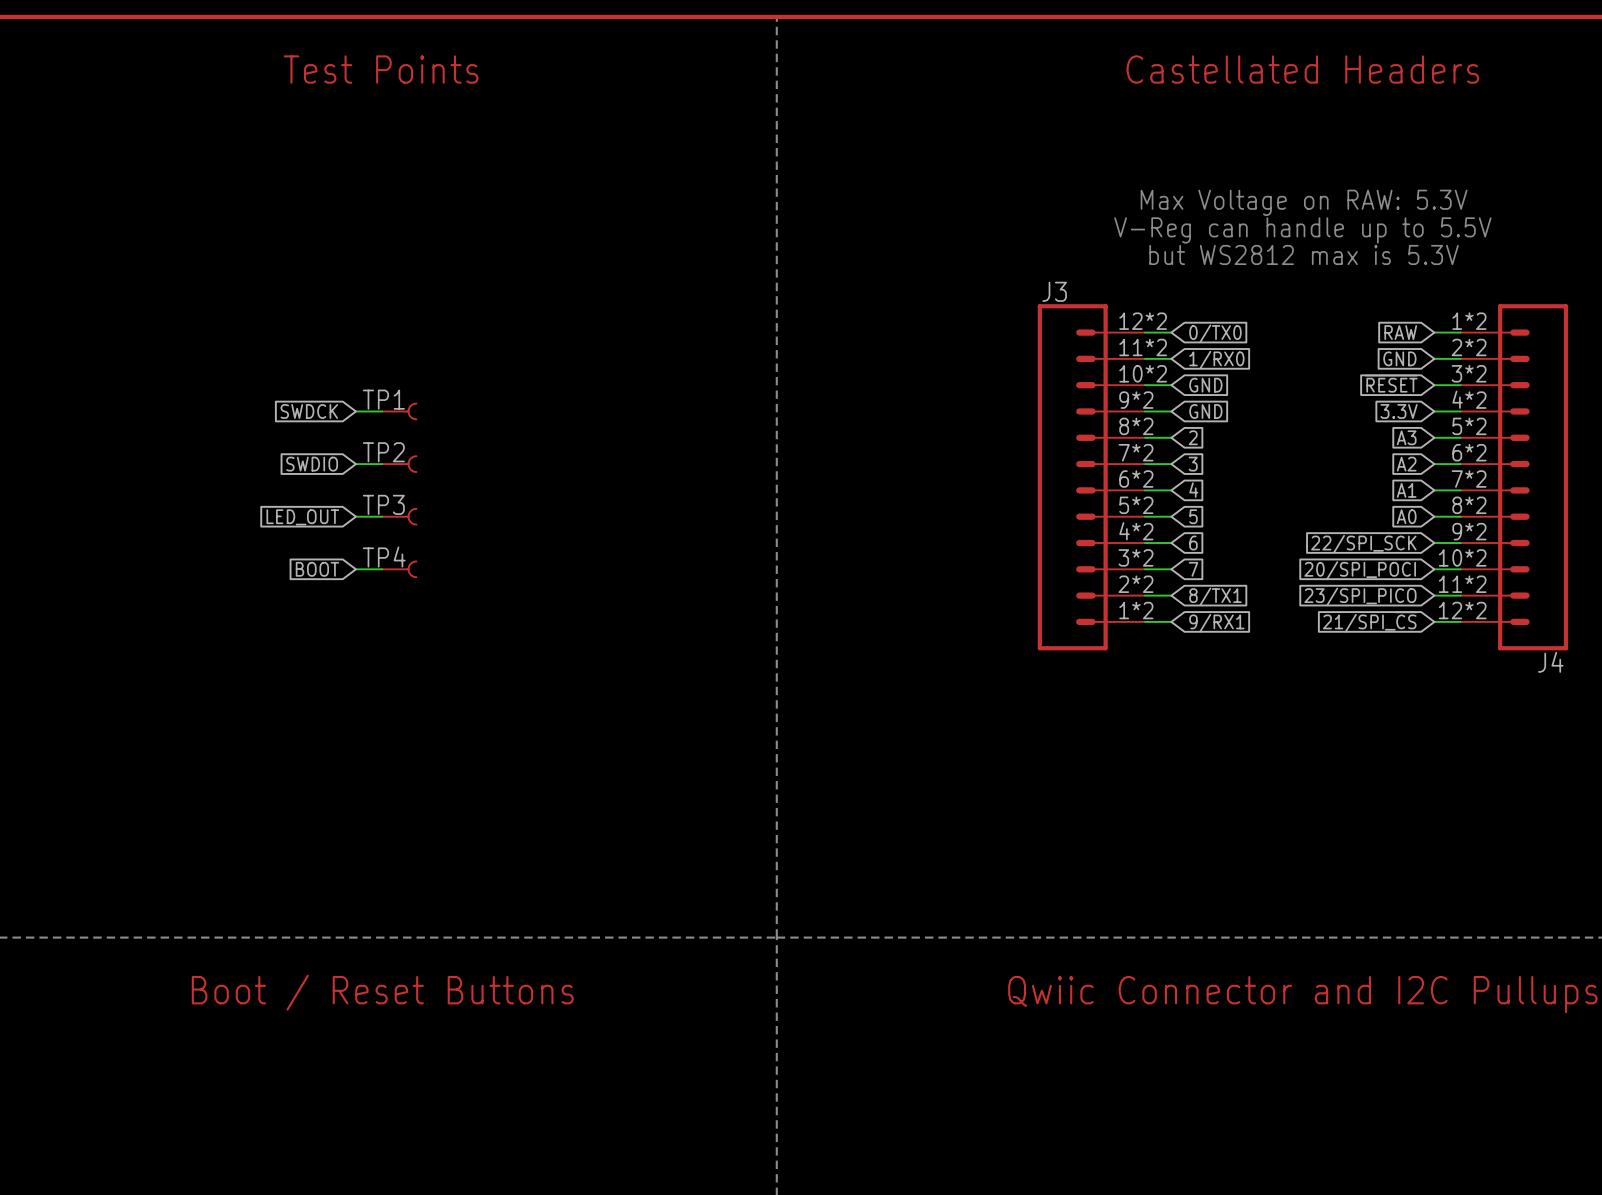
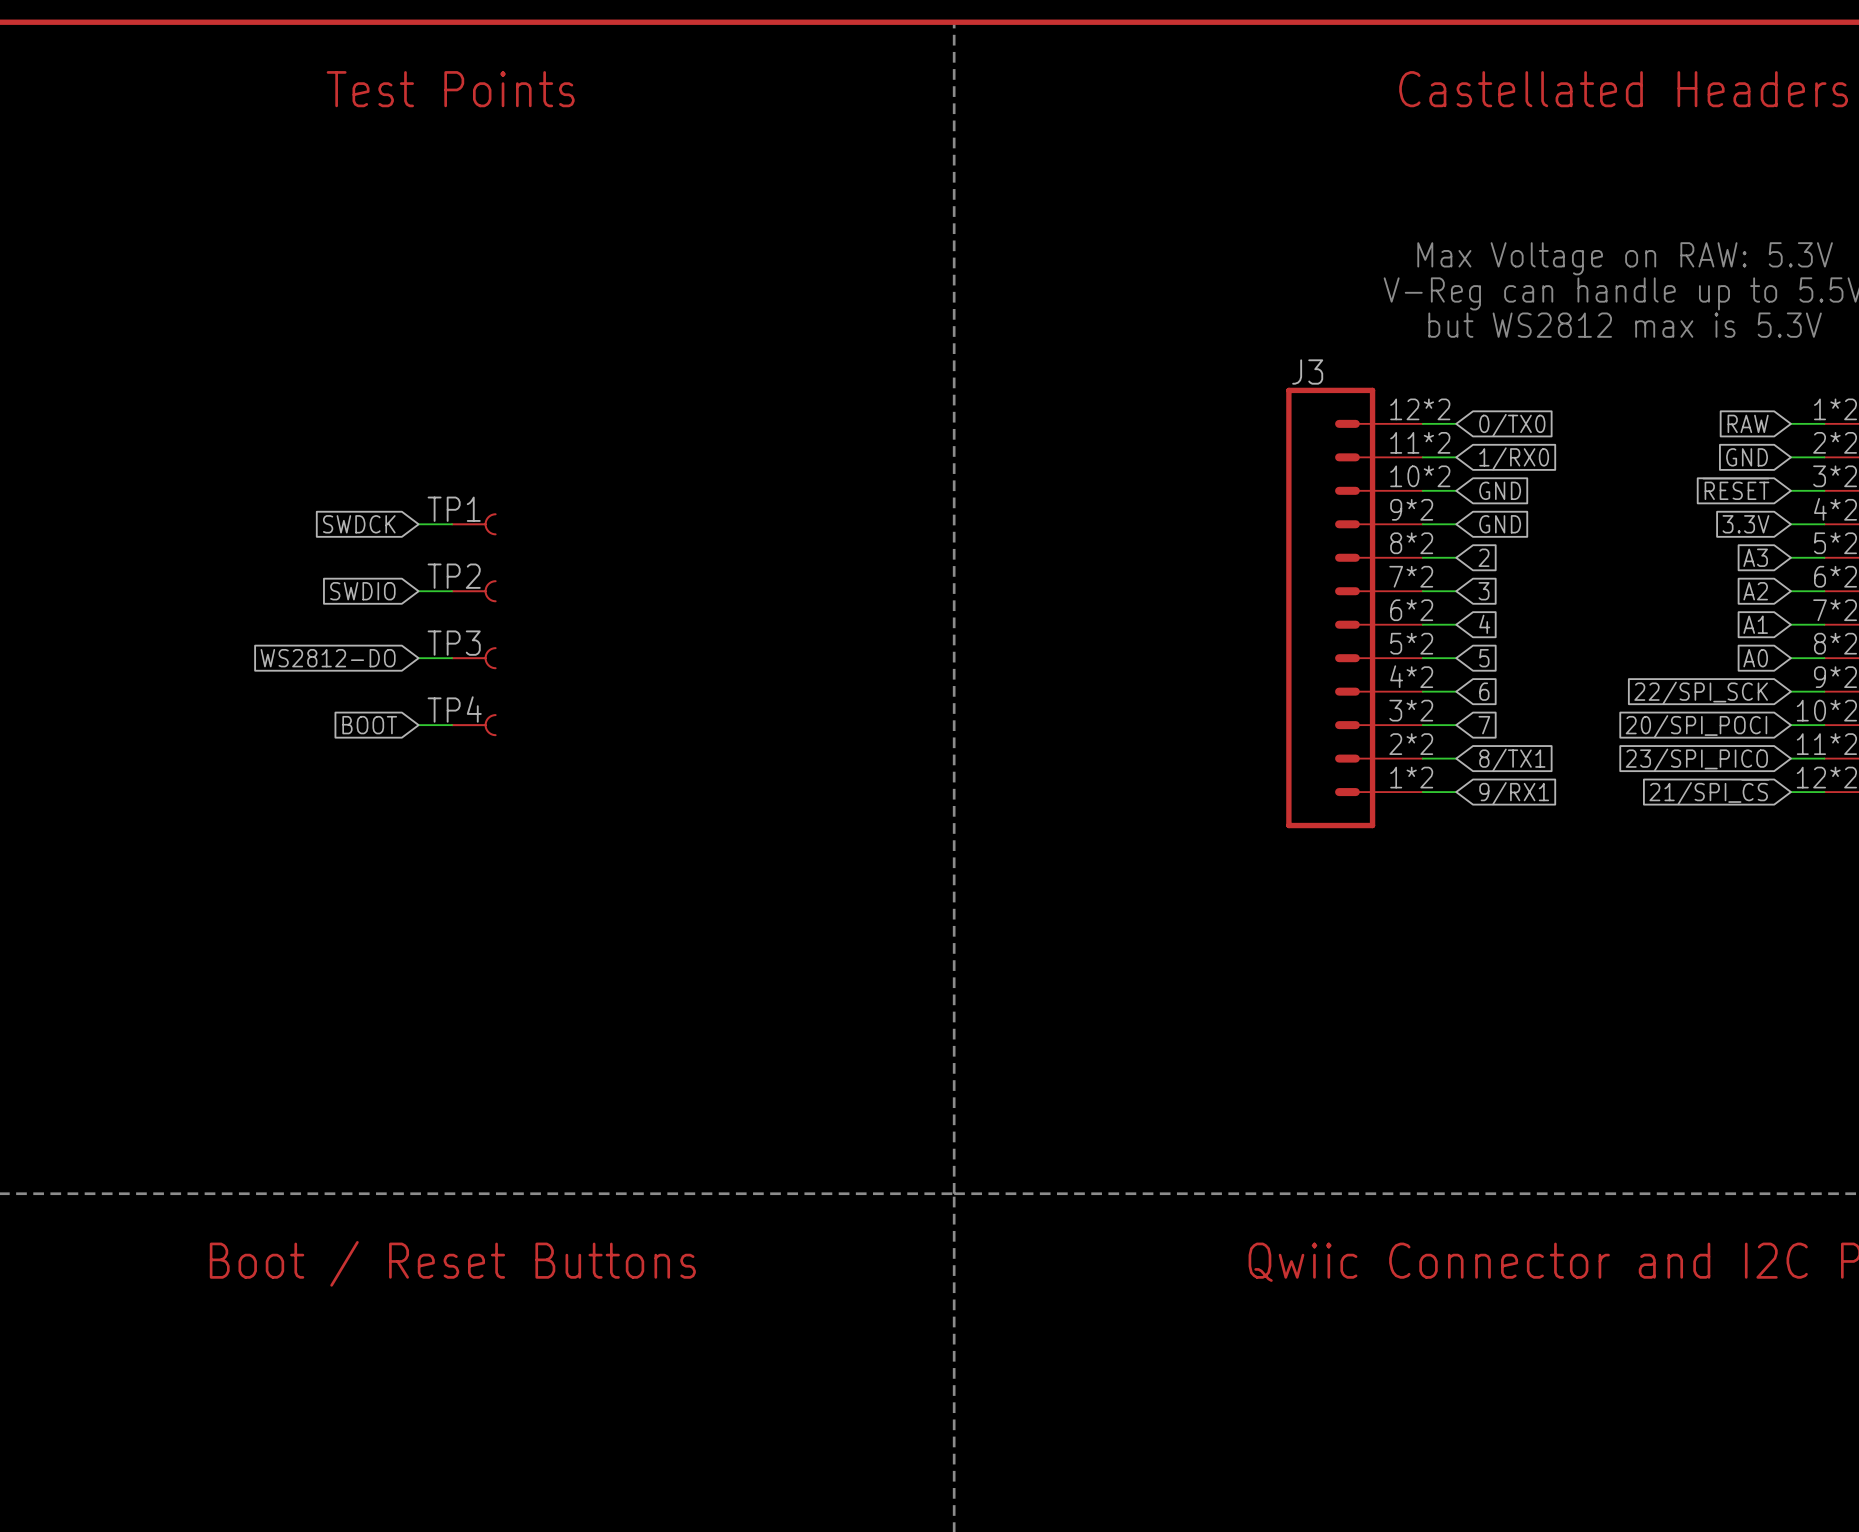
global label: LED_OUT (302, 517) -> WS2812-DO (328, 658)

